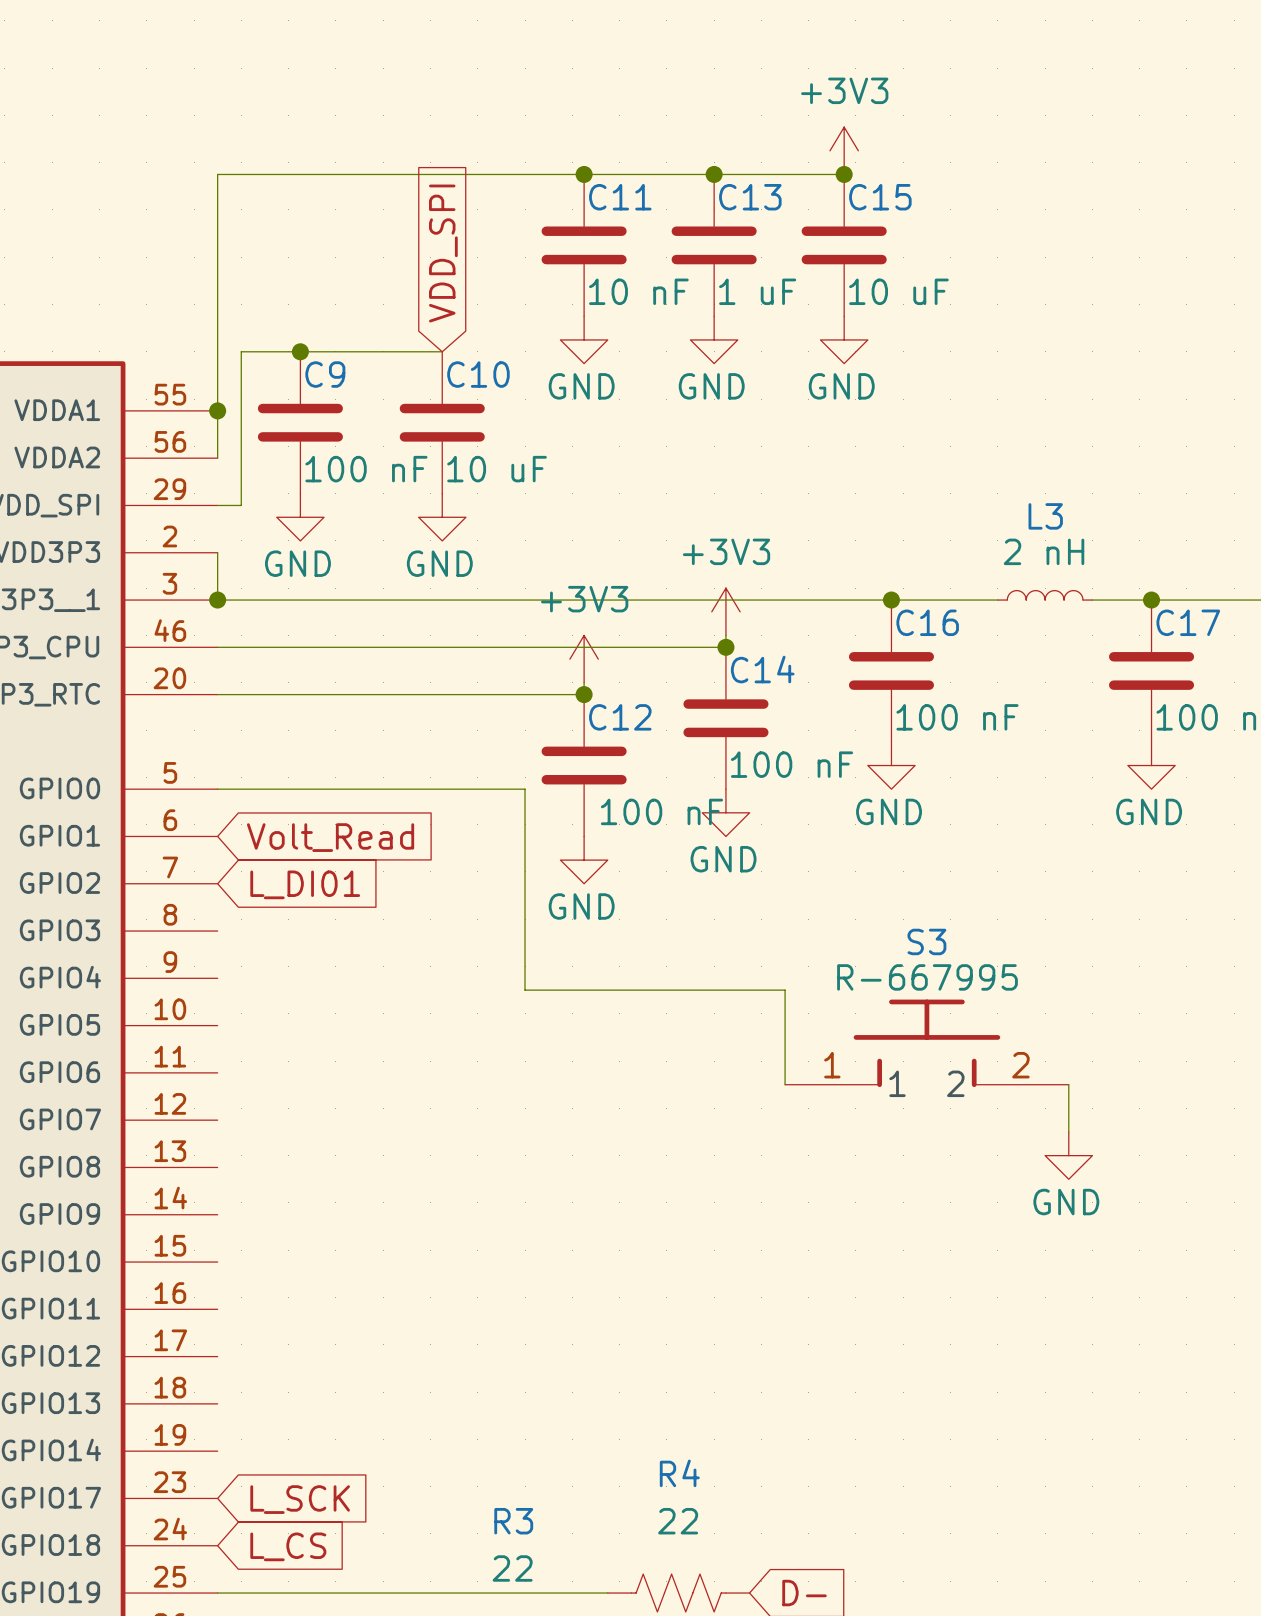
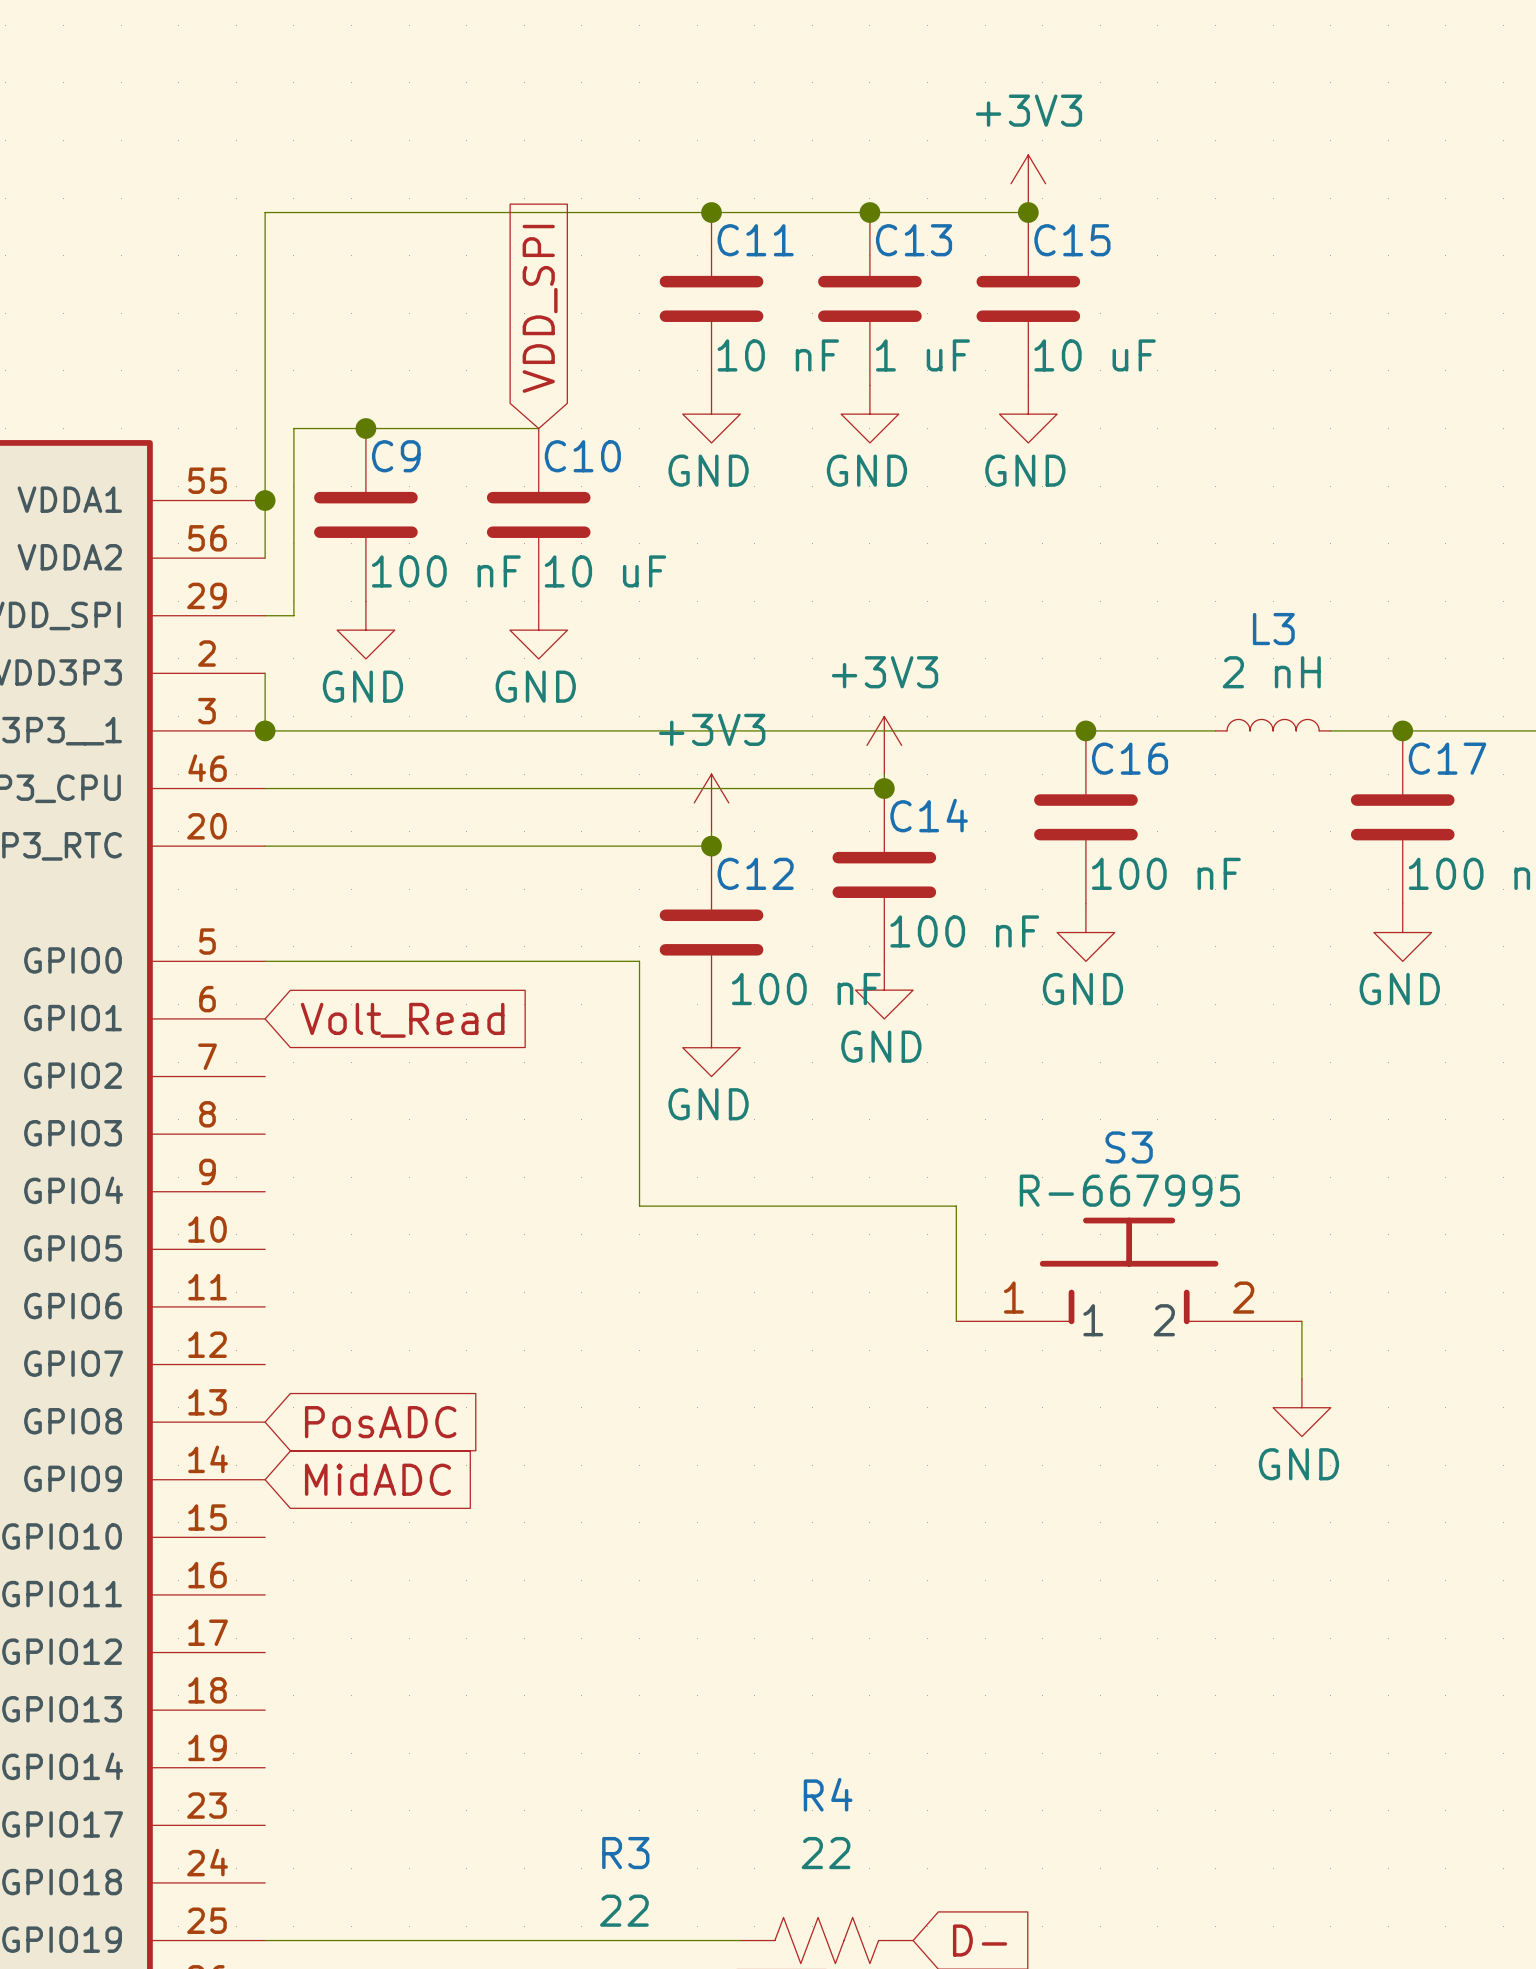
global label: L_DI01 (305, 884) -> none
global label: none -> PosADC (380, 1422)
global label: none -> MidADC (377, 1479)
global label: L_SCK (300, 1499) -> none
global label: L_CS (288, 1546) -> none

